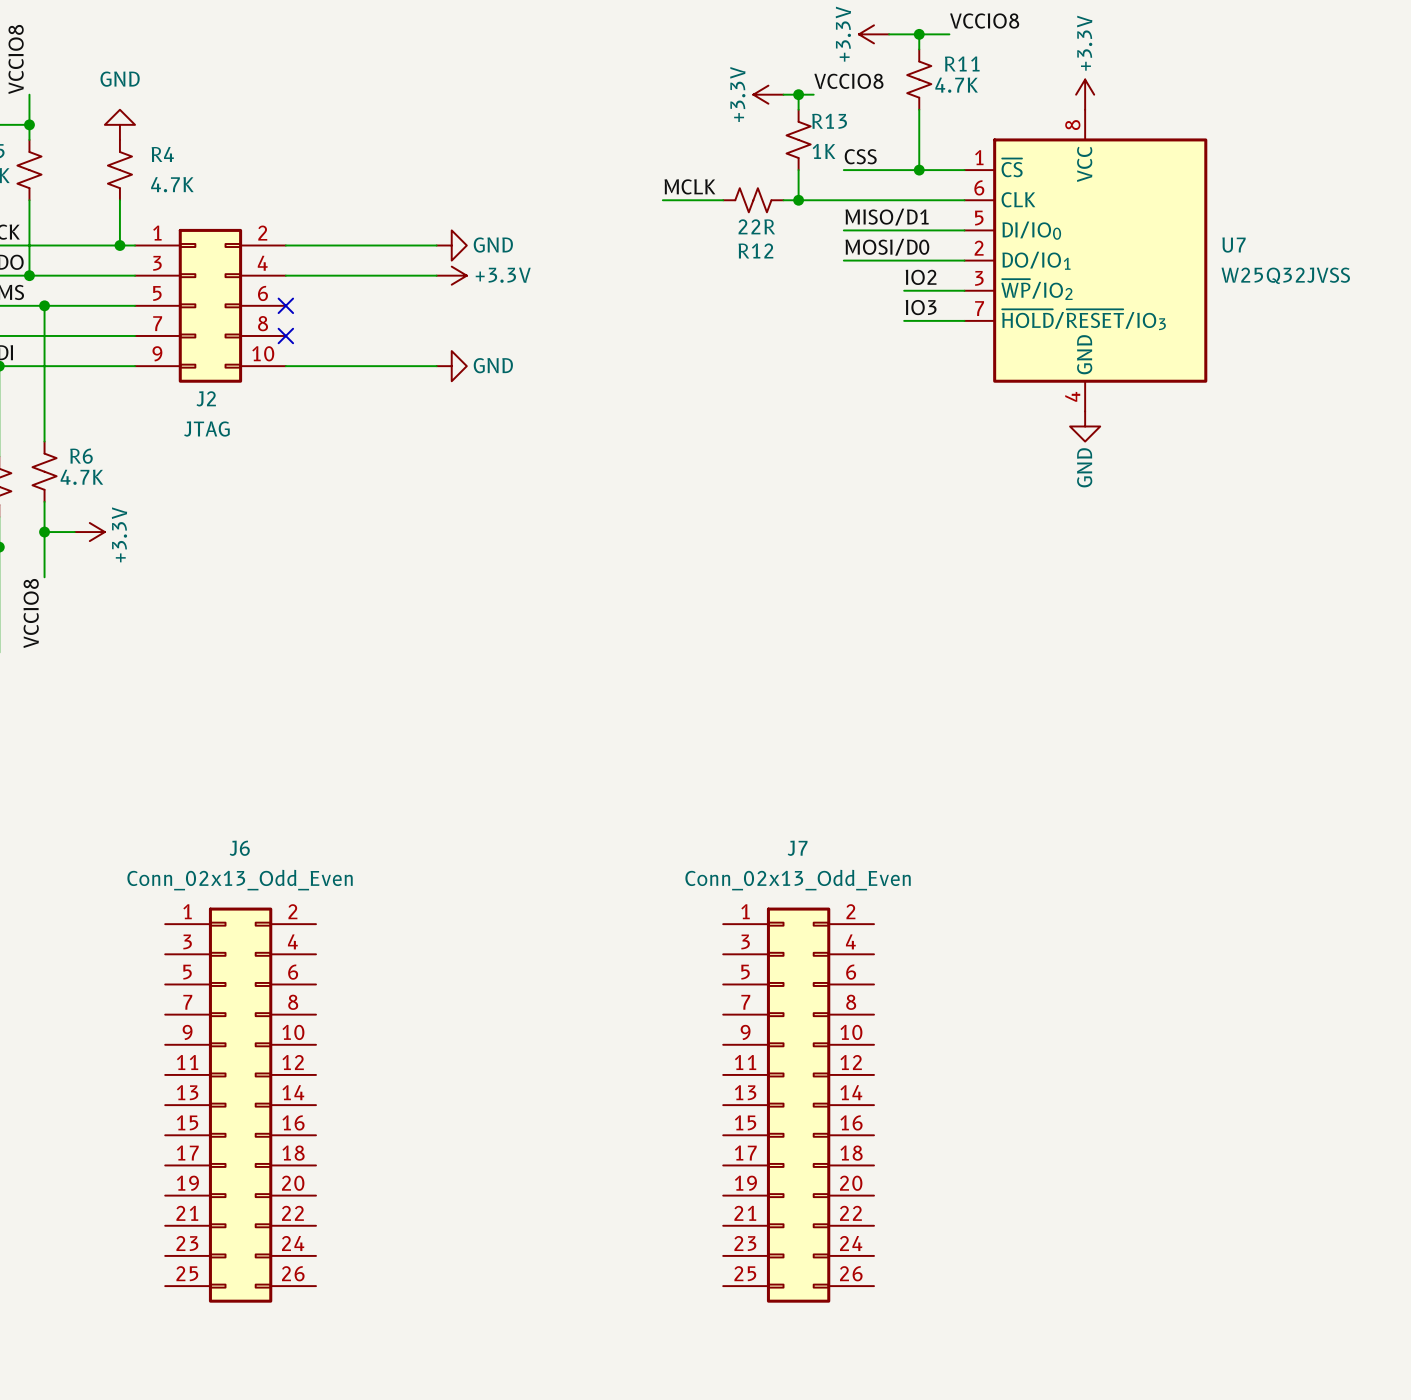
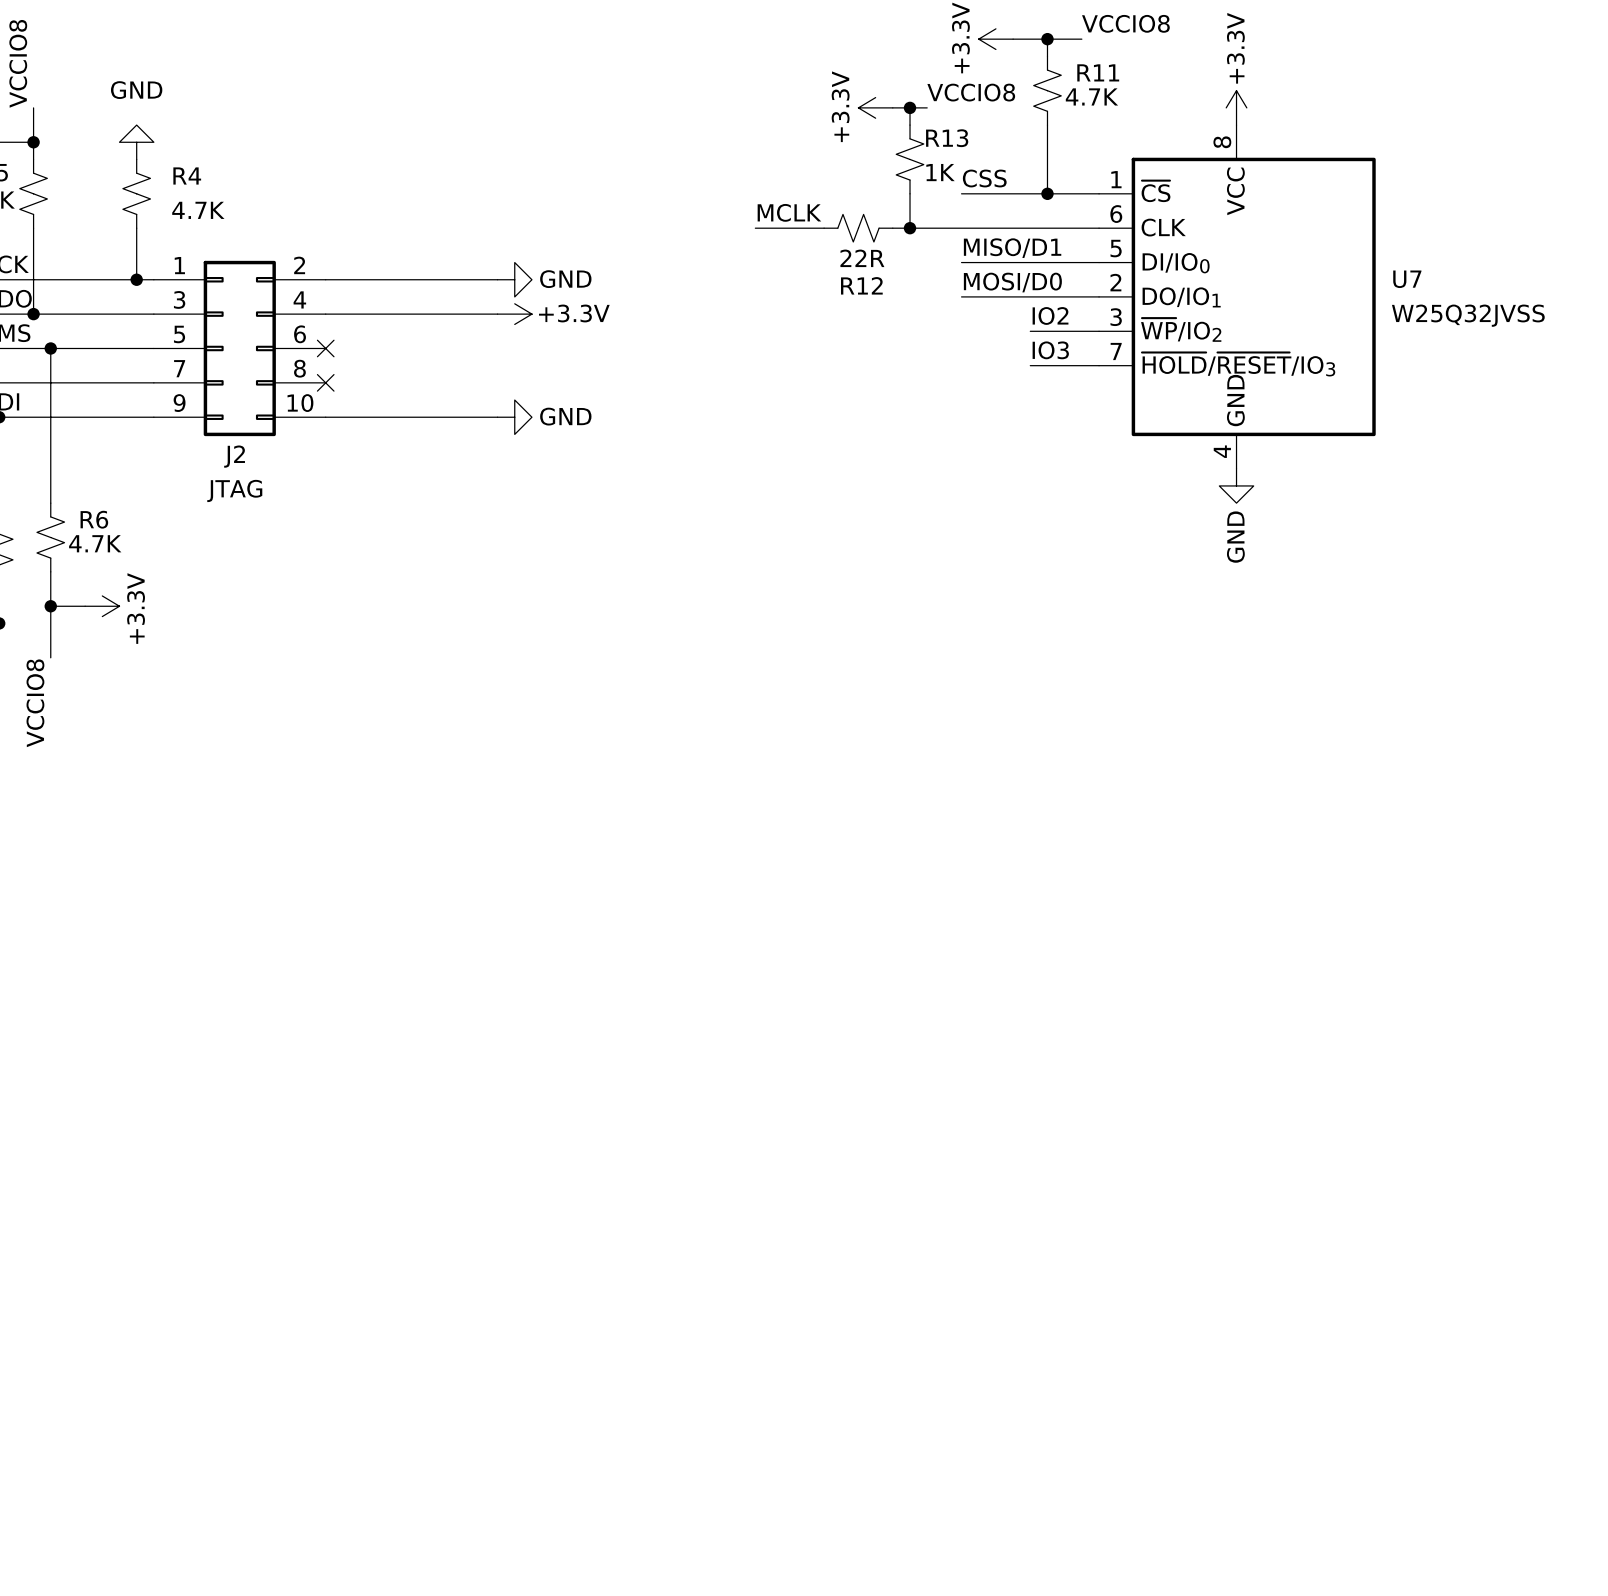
J6: Conn_02x13_Odd_Even (240, 1105) -> none
J7: Conn_02x13_Odd_Even (798, 1105) -> none

